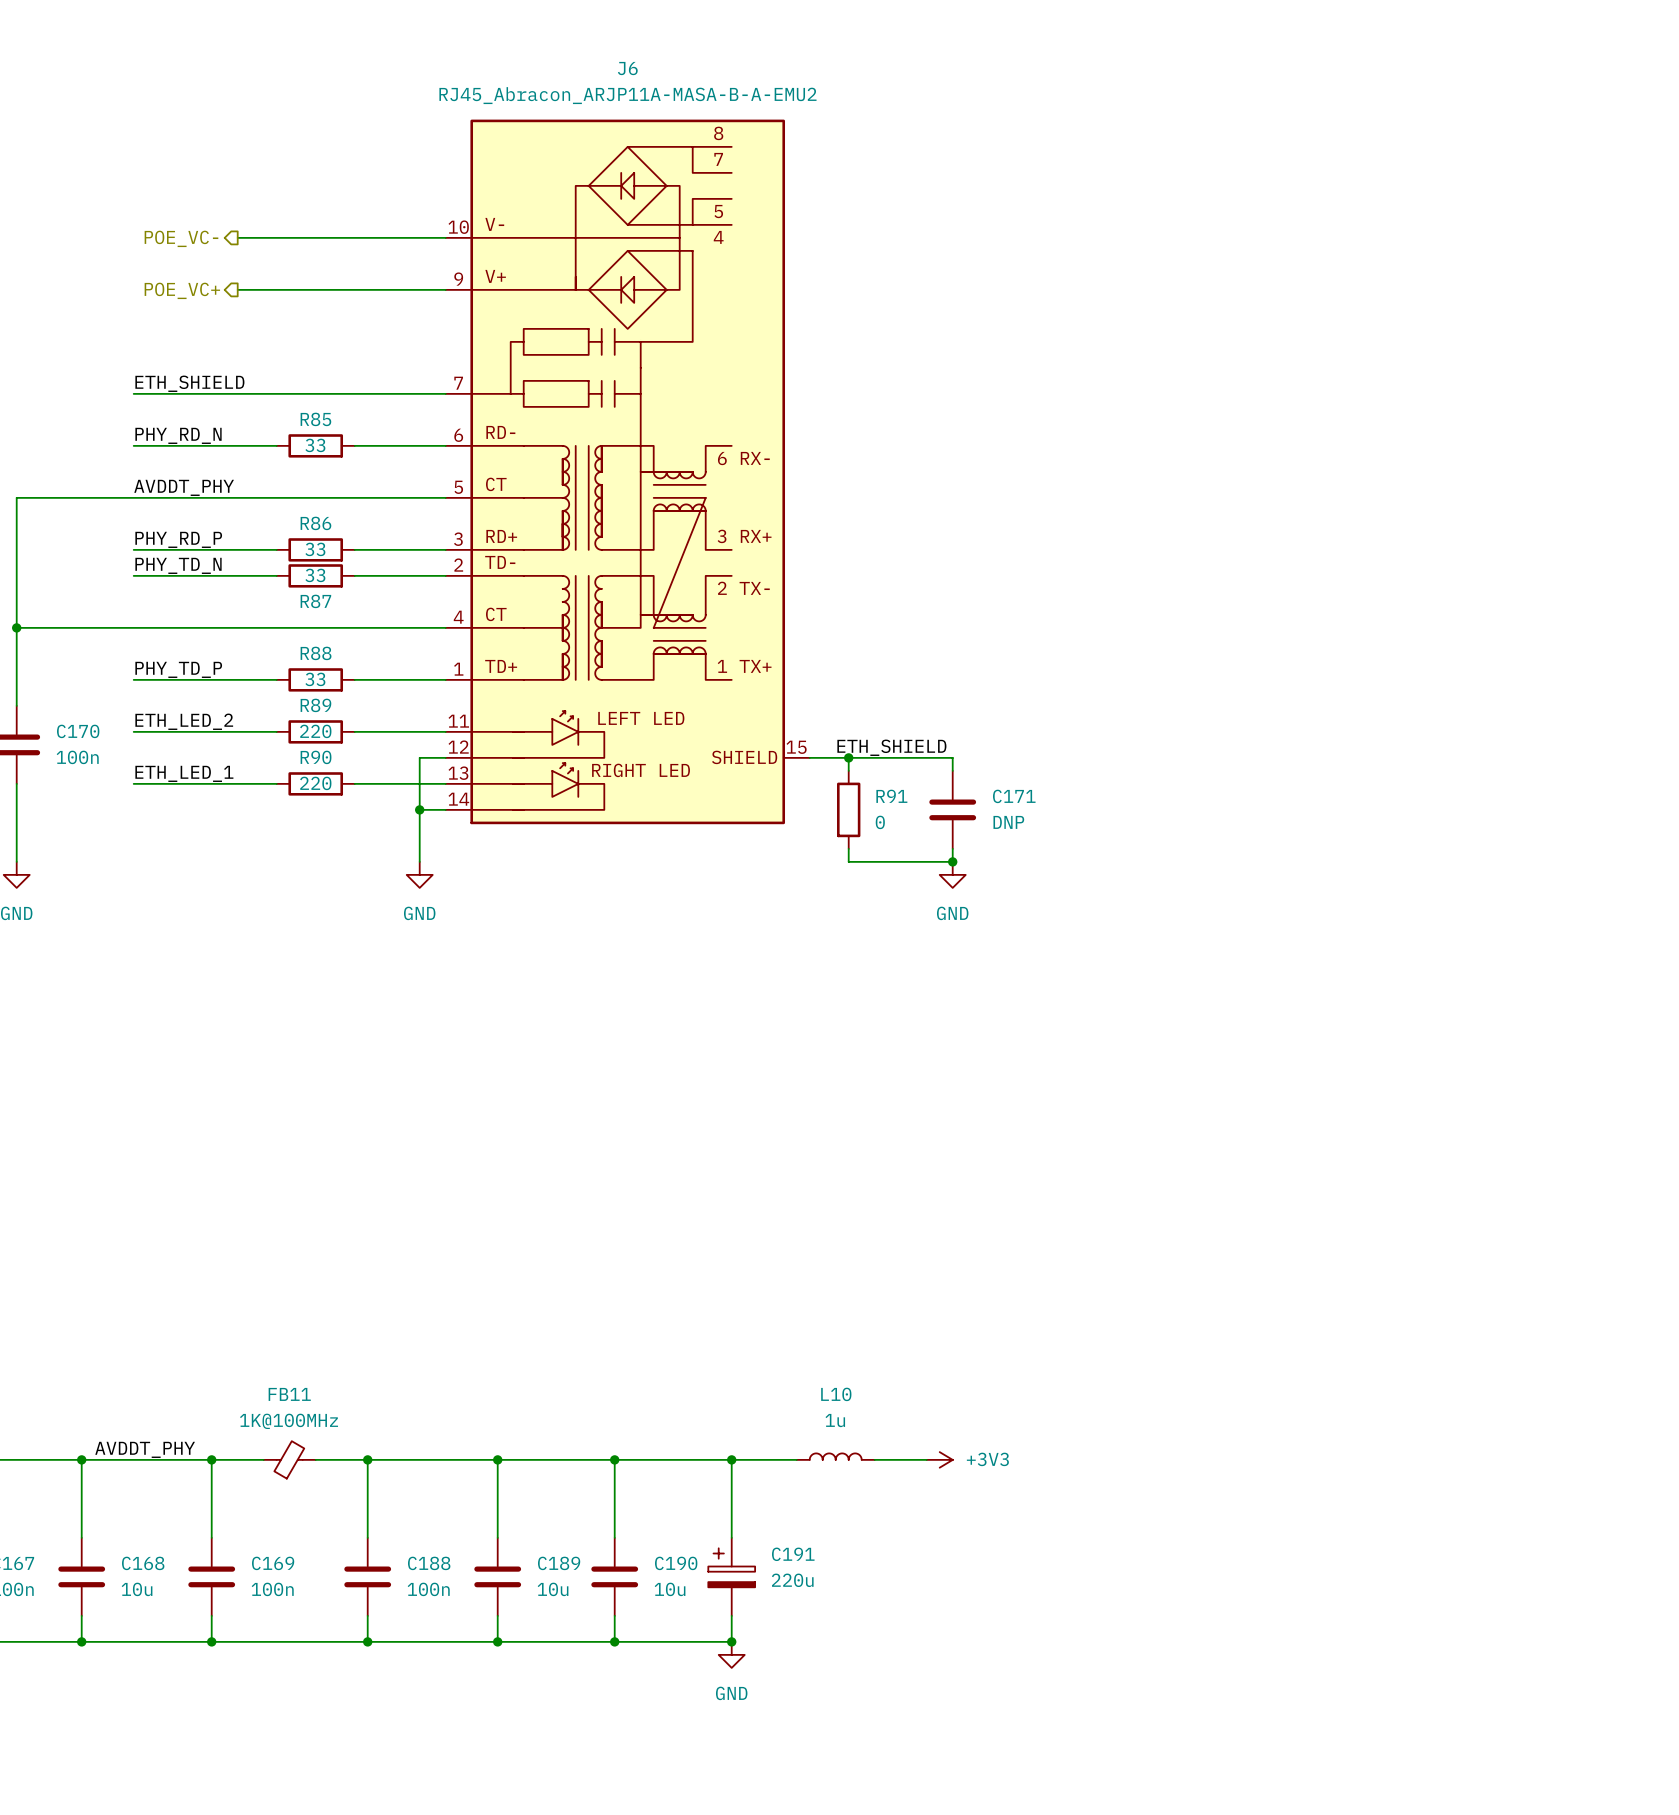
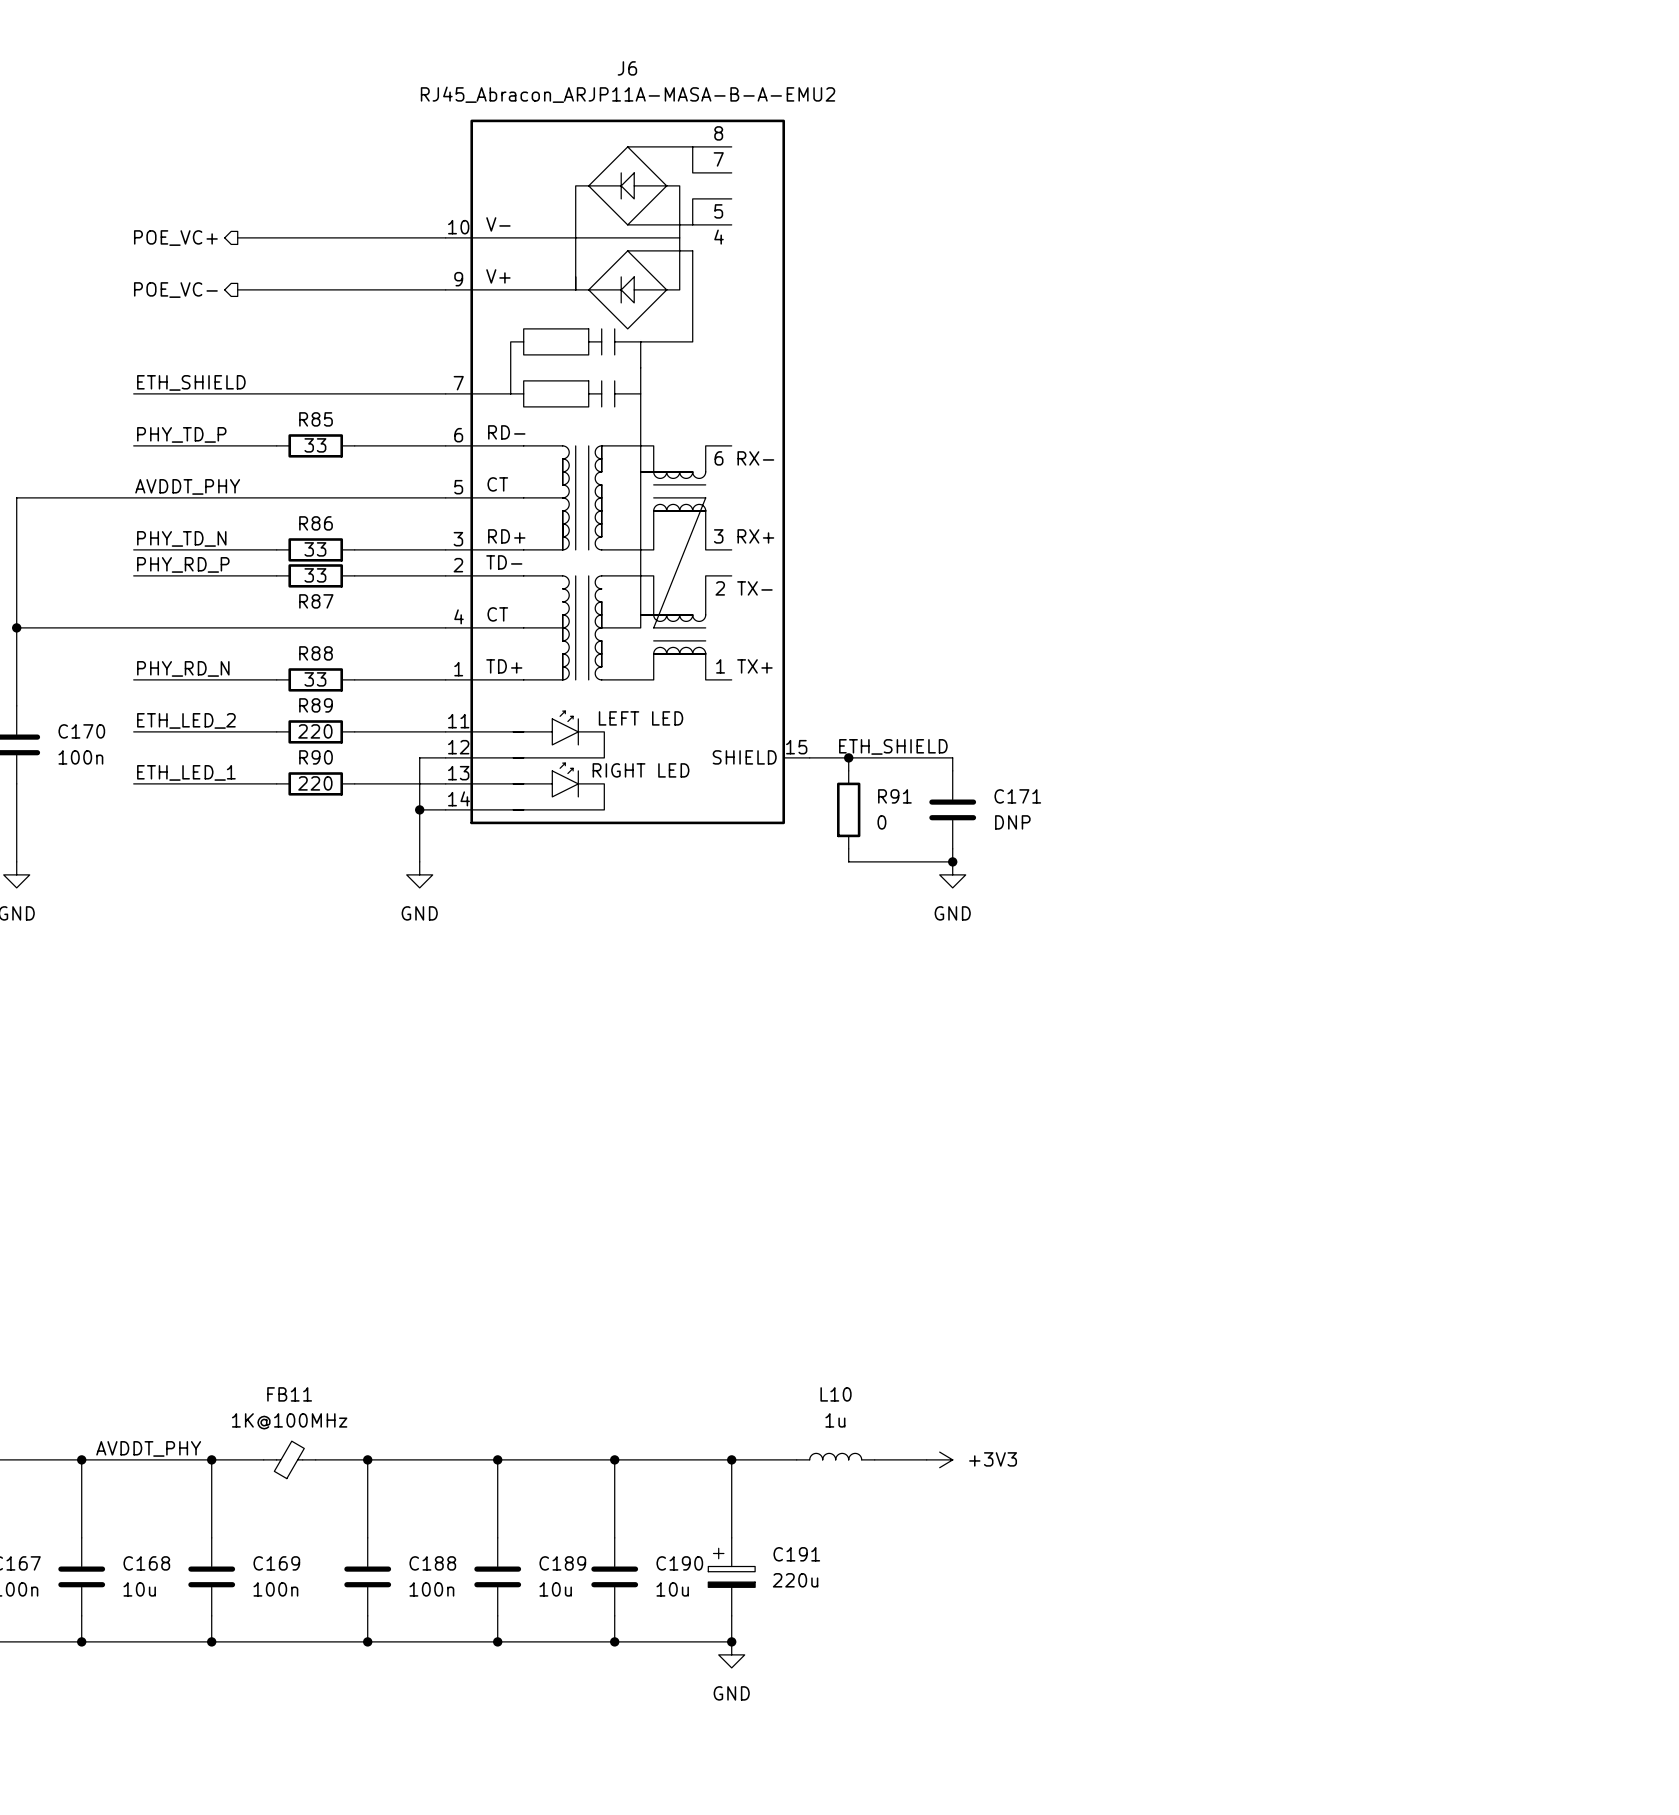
hierarchical label: POE_VC- (181, 238) -> POE_VC+ (175, 238)
hierarchical label: POE_VC+ (182, 290) -> POE_VC- (175, 290)
label: PHY_RD_N (178, 435) -> PHY_TD_P (181, 434)
label: PHY_RD_P (178, 539) -> PHY_TD_N (181, 538)
label: PHY_TD_N (178, 565) -> PHY_RD_P (183, 564)
label: PHY_TD_P (178, 669) -> PHY_RD_N (183, 668)

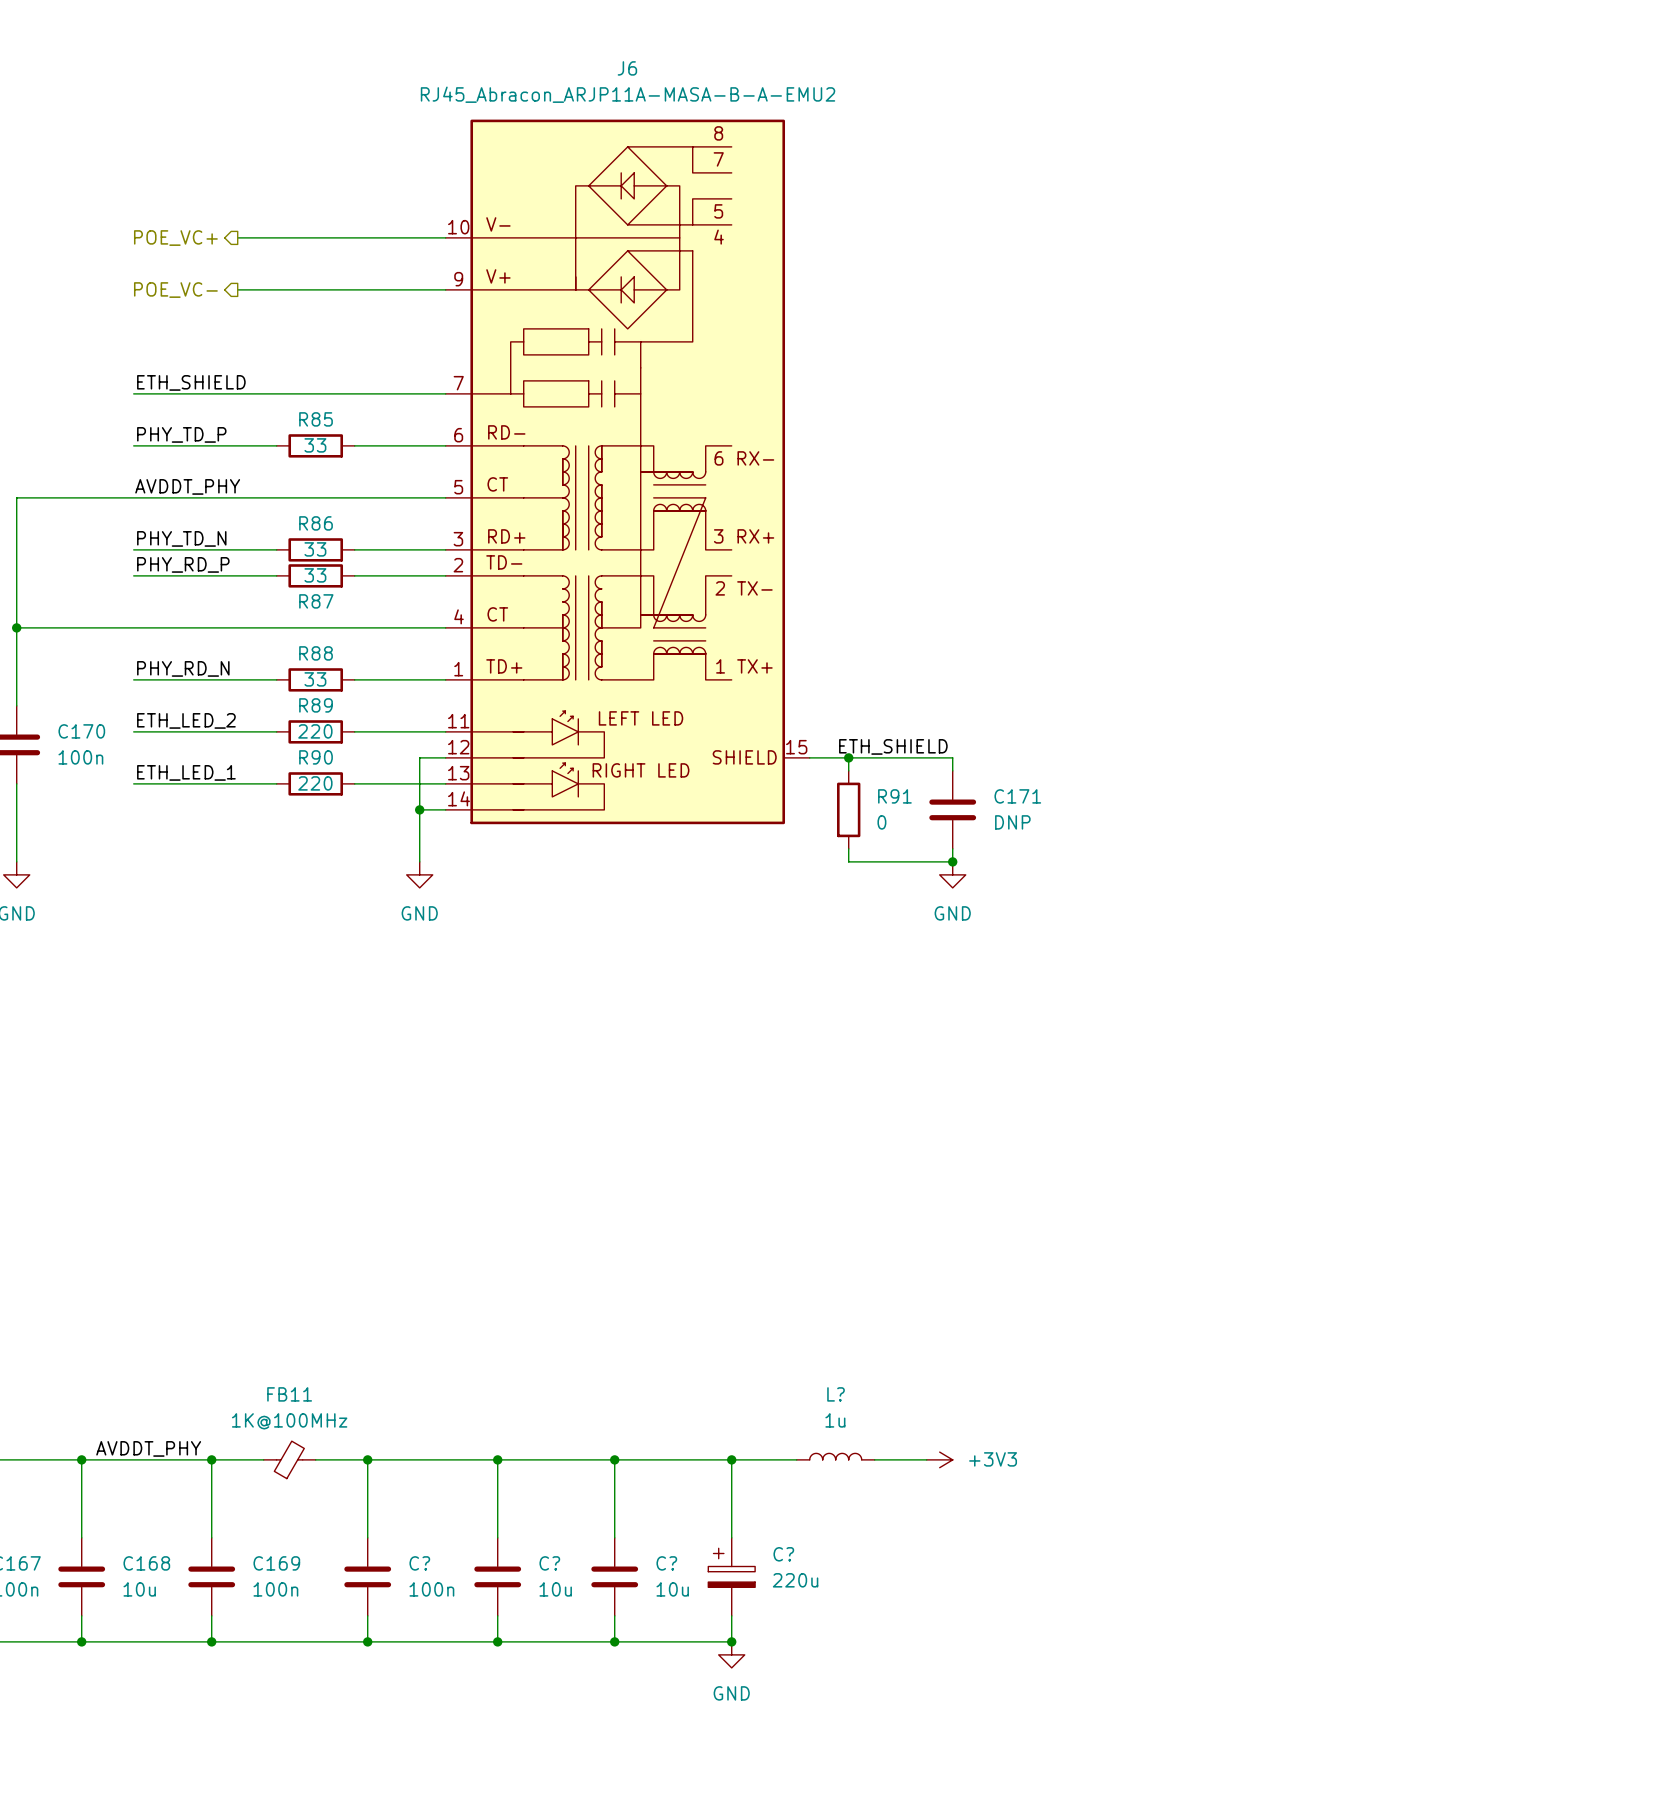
L10 name: L10 (836, 1394) -> L? (836, 1394)
C191 name: C191 (796, 1554) -> C? (783, 1554)
C188 name: C188 (432, 1563) -> C? (419, 1563)
C189 name: C189 (562, 1563) -> C? (549, 1563)
C190 name: C190 (679, 1563) -> C? (666, 1563)

